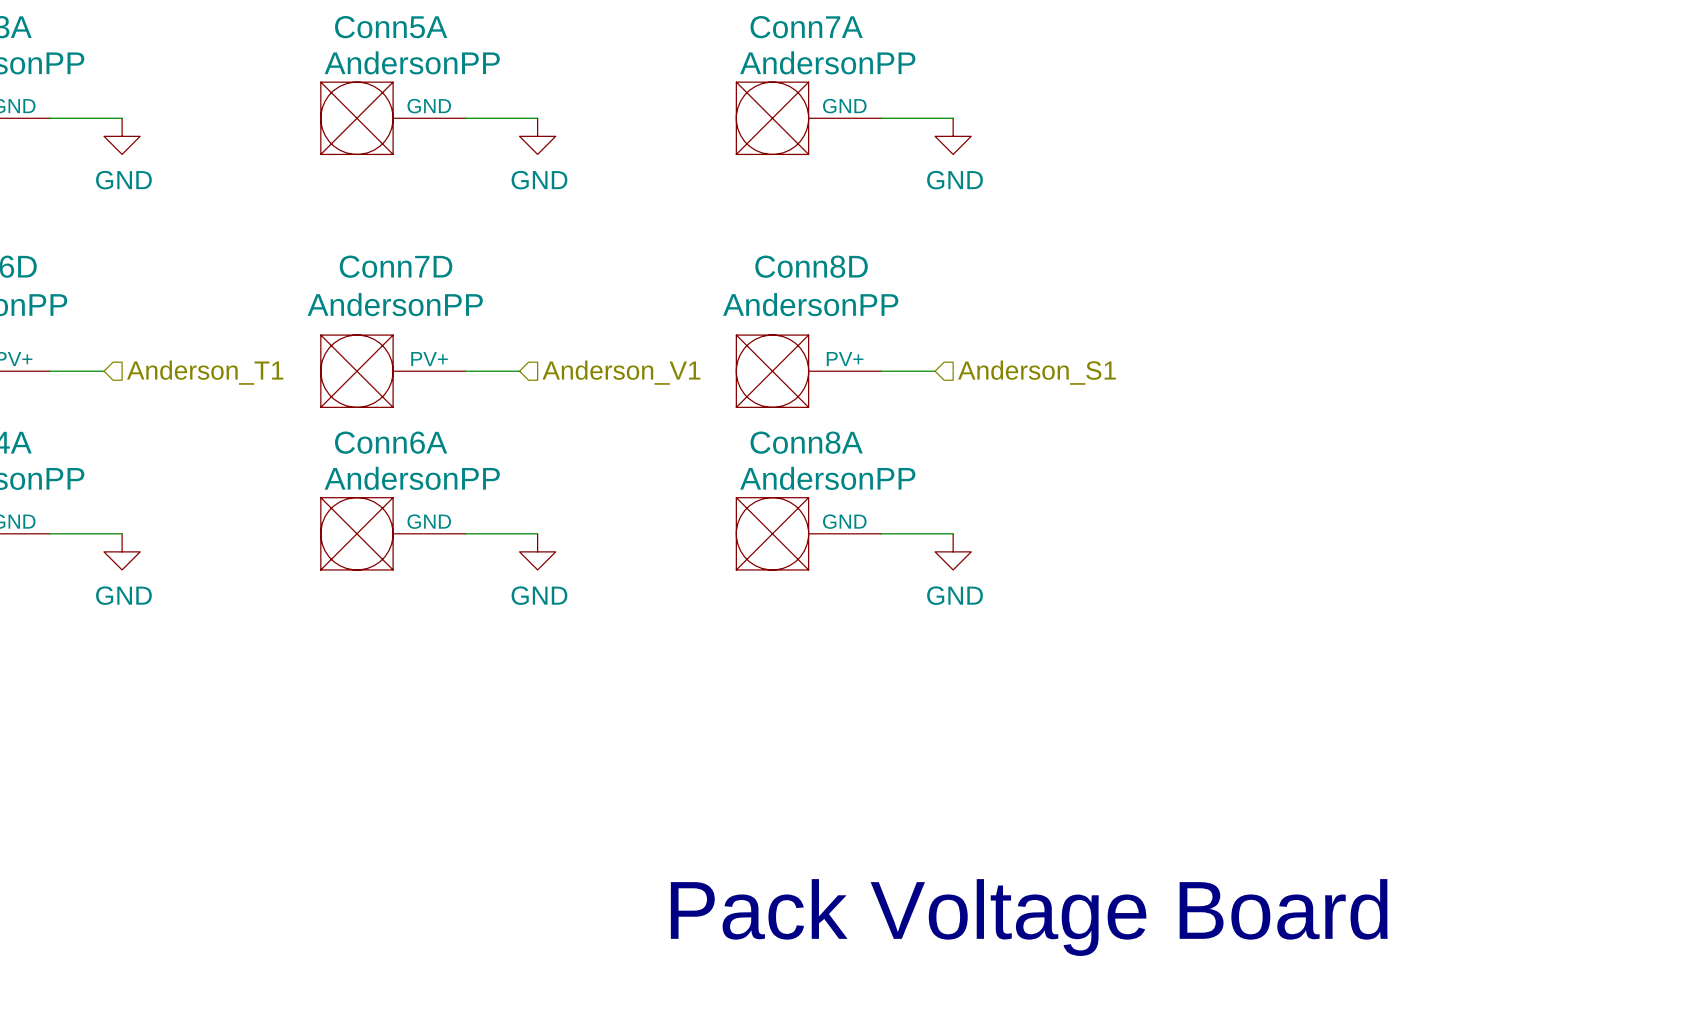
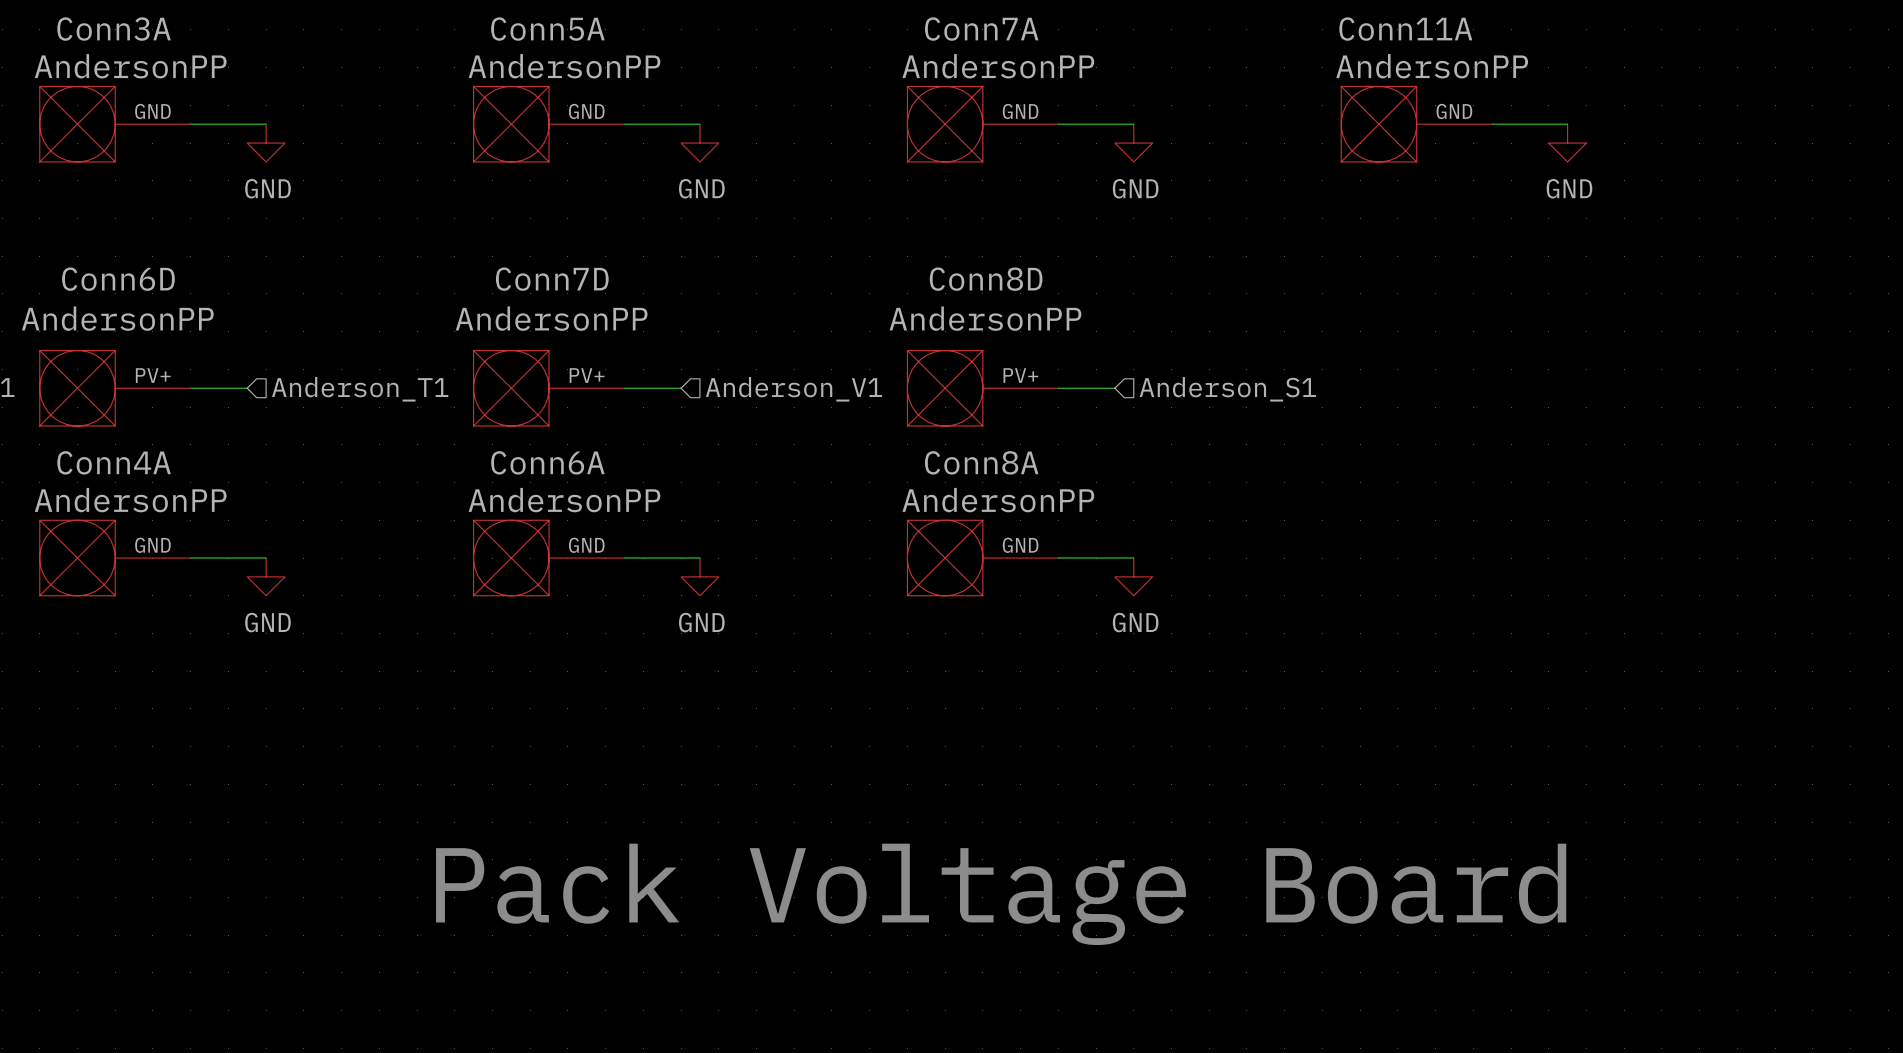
Conn11A: none -> AndersonPP (1416, 124)
wire: none -> (1492, 124) (1567, 124)
power symbol: none -> GND (1567, 143)
text: none -> Pack Voltage Board (1001, 894)
text: Pack Voltage Board (1029, 917) -> none

